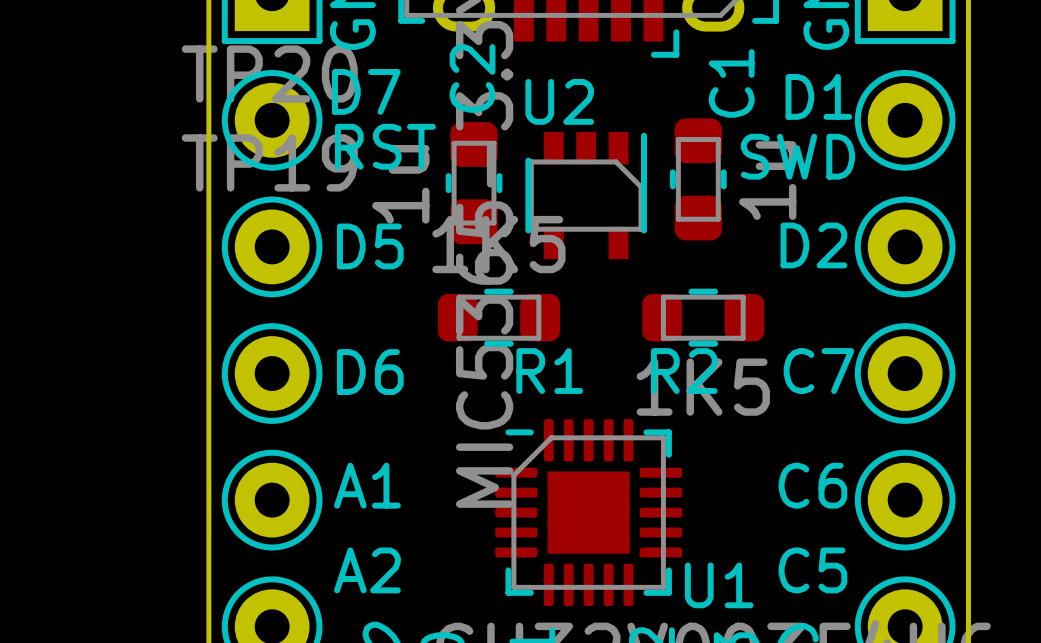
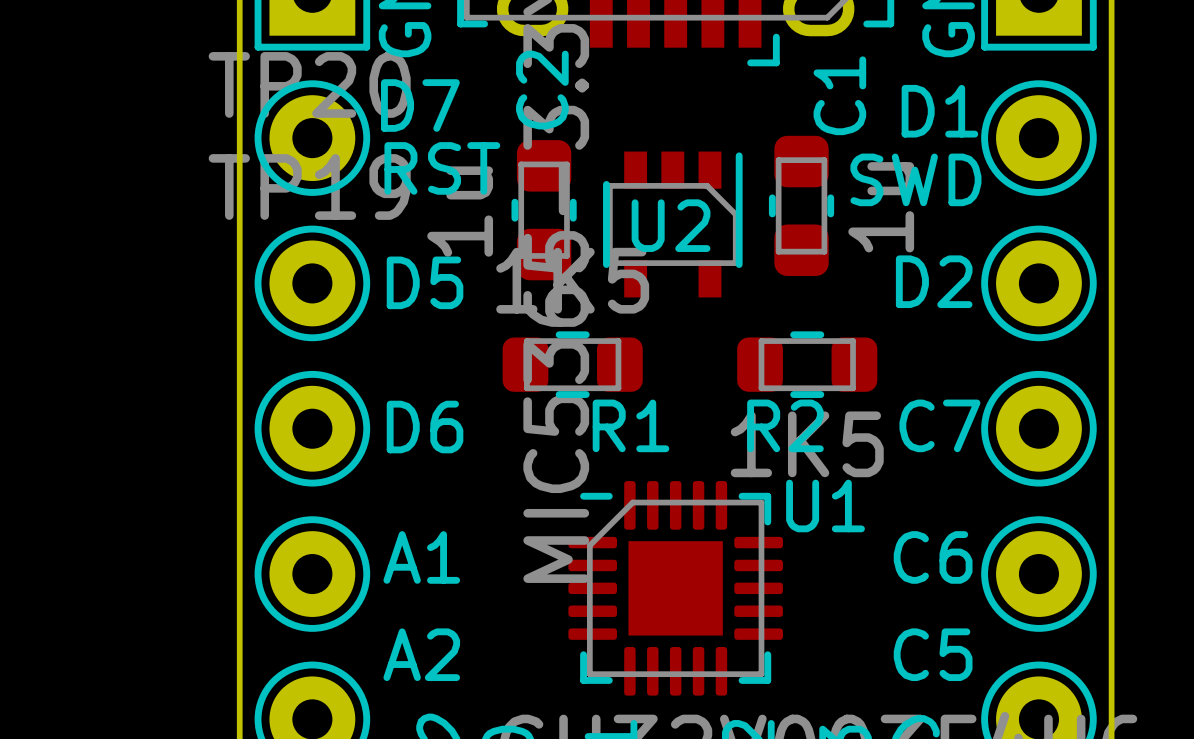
U2 name position: U2 (559, 101) -> U2 (671, 225)
U1 name position: U1 (719, 585) -> U1 (825, 505)

